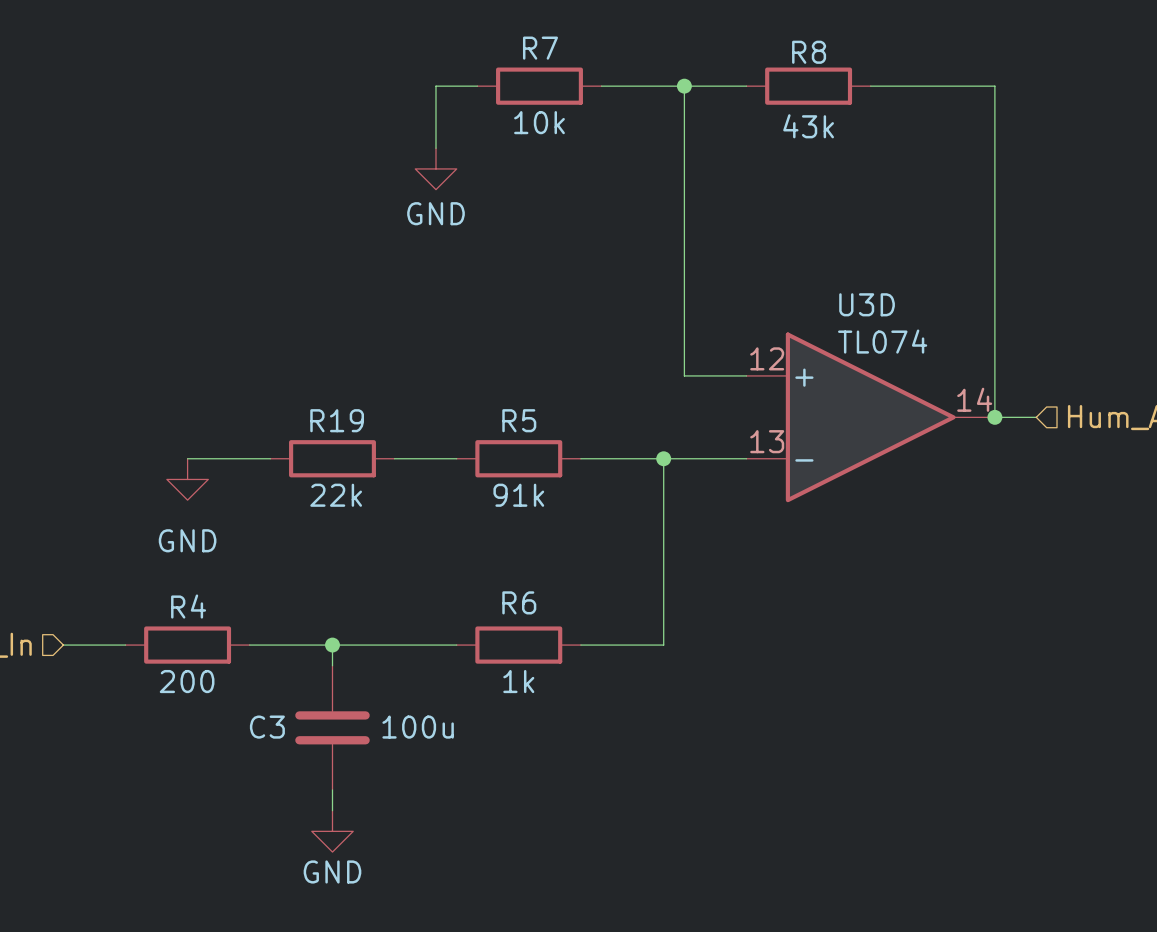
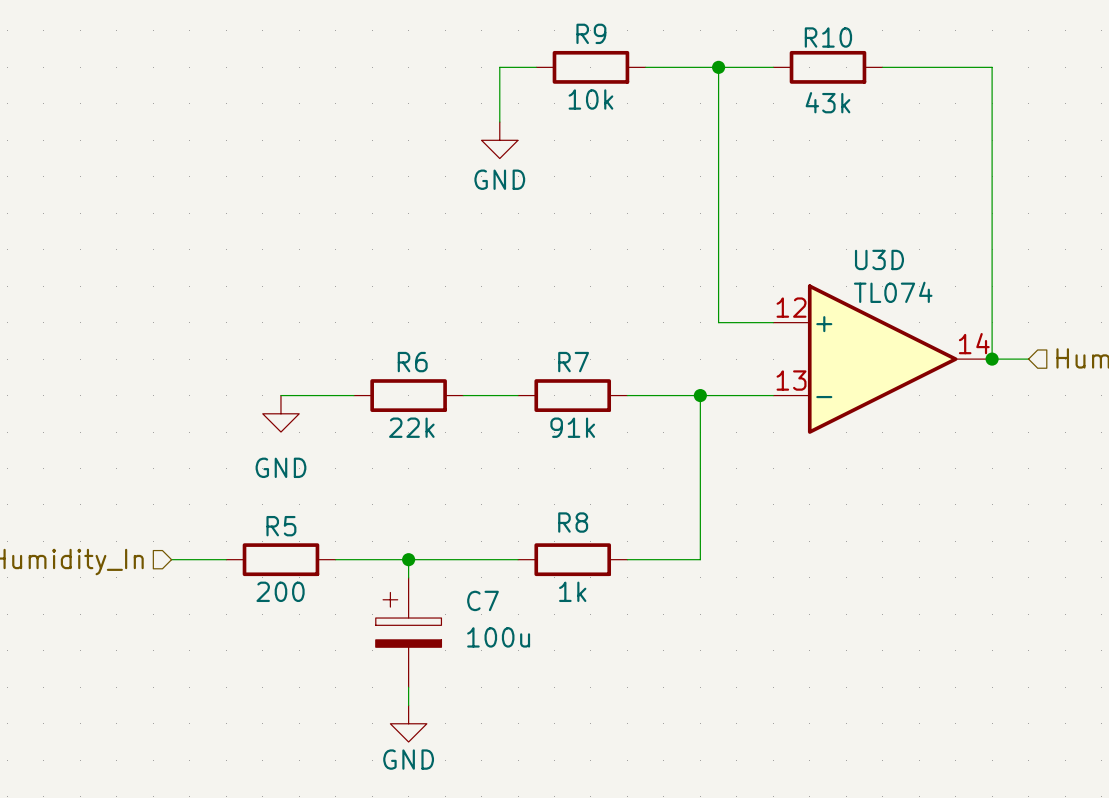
R7 name: R7 (540, 48) -> R9 (591, 33)
R8 name: R8 (809, 52) -> R10 (828, 37)
R19 name: R19 (337, 420) -> R6 (412, 362)
R5 name: R5 (519, 420) -> R7 (573, 362)
R6 name: R6 (519, 602) -> R8 (573, 522)
R4 name: R4 (188, 606) -> R5 (281, 526)
C3: 100u (332, 727) -> none
C7: none -> 100u (408, 632)

